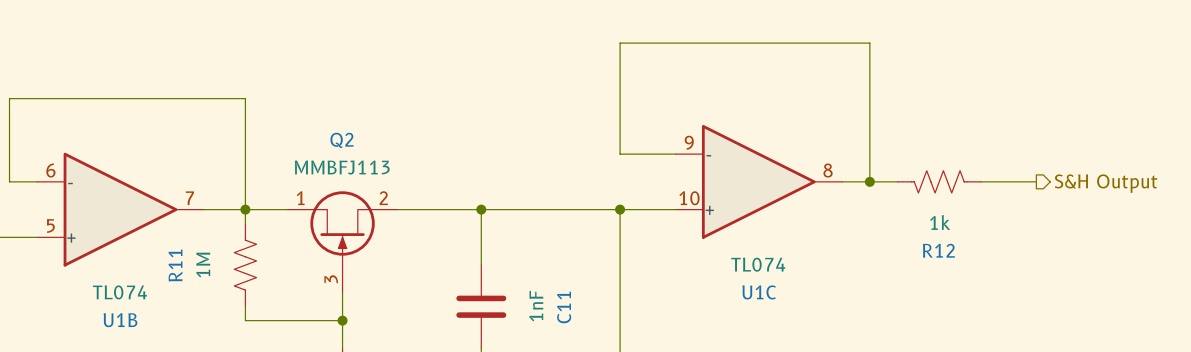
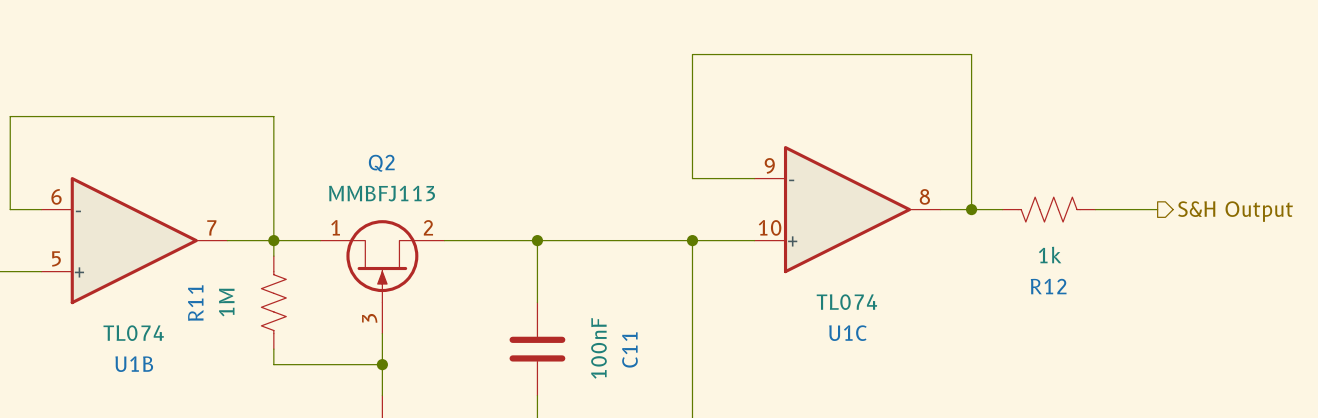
C11 value: 1nF (536, 306) -> 100nF (598, 348)

